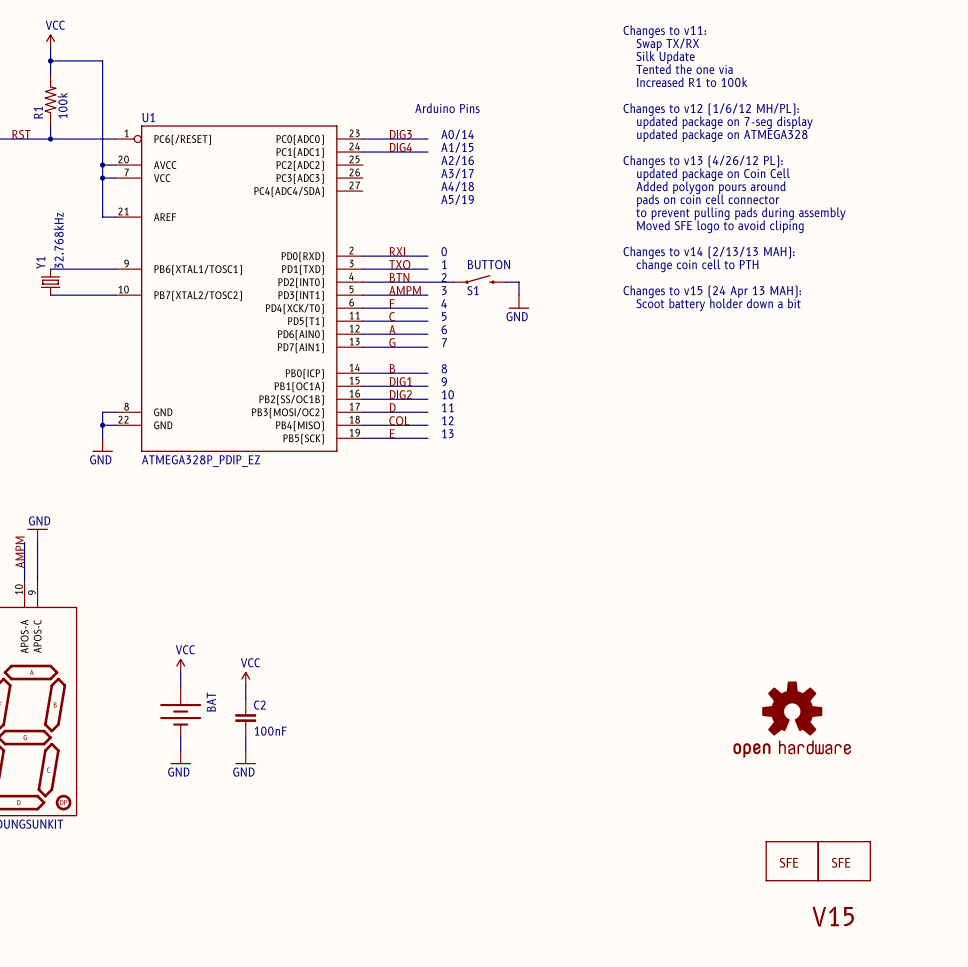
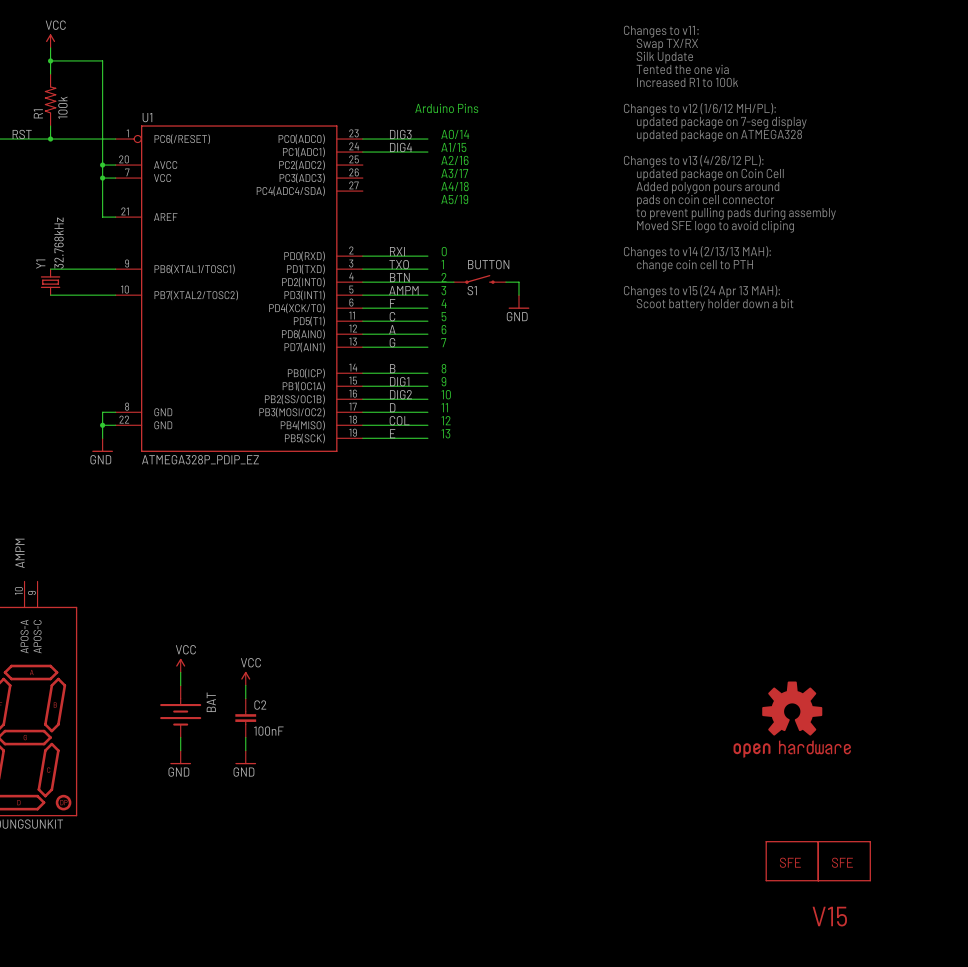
power symbol: GND (37, 535) -> none
wire: (24, 542) (24, 581) -> none
wire: (37, 542) (37, 581) -> none

